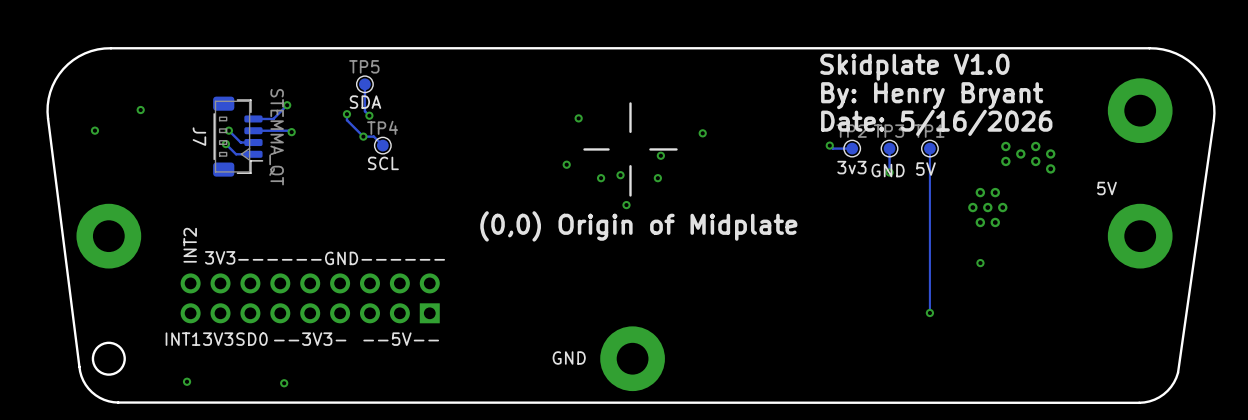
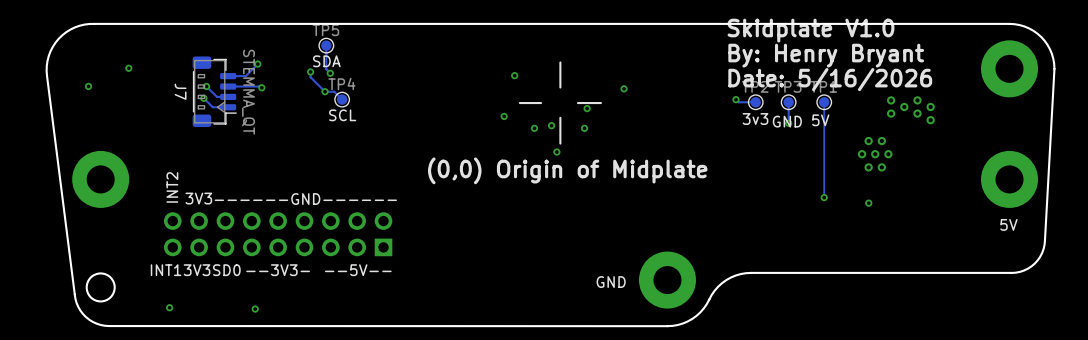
text position: 5V (1107, 188) -> 5V (1008, 224)
track: (929, 256) (929, 313) -> none
via position: (929, 313) -> (824, 197)
board edge: none -> (1011, 272) (745, 273) (726, 280) (714, 290) (703, 308) (696, 315) (687, 321) (672, 325) (109, 326)
text position: GND (569, 357) -> GND (611, 282)
part position: (632, 358) -> (667, 280)
board edge: (79, 366) (47, 105) (52, 85) (63, 69) (78, 56) (97, 49) (1156, 48) (1169, 51) (1187, 60) (1202, 74) (1211, 93) (1213, 120) (1178, 372) (1167, 390) (1149, 401) (118, 402) -> (74, 294) (46, 65) (52, 46) (62, 35) (74, 27) (89, 23) (1019, 25) (1033, 30) (1044, 40) (1051, 54) (1054, 68) (1044, 244) (1042, 252) (1034, 263) (1024, 270) (1011, 272)

